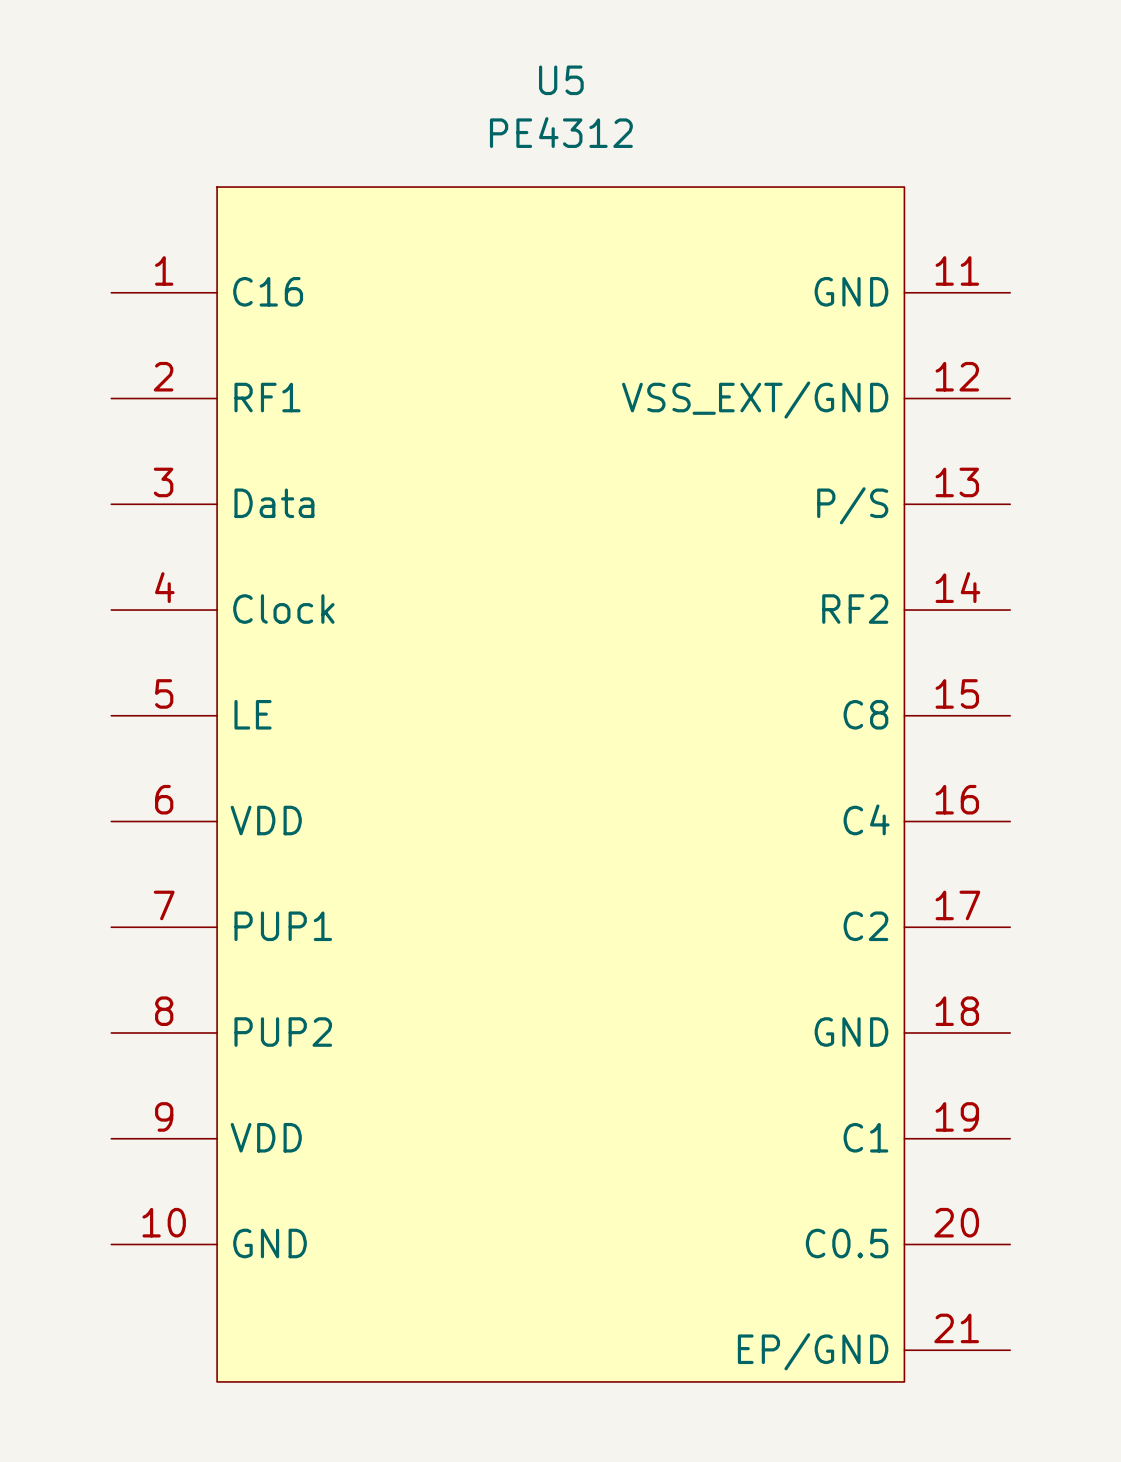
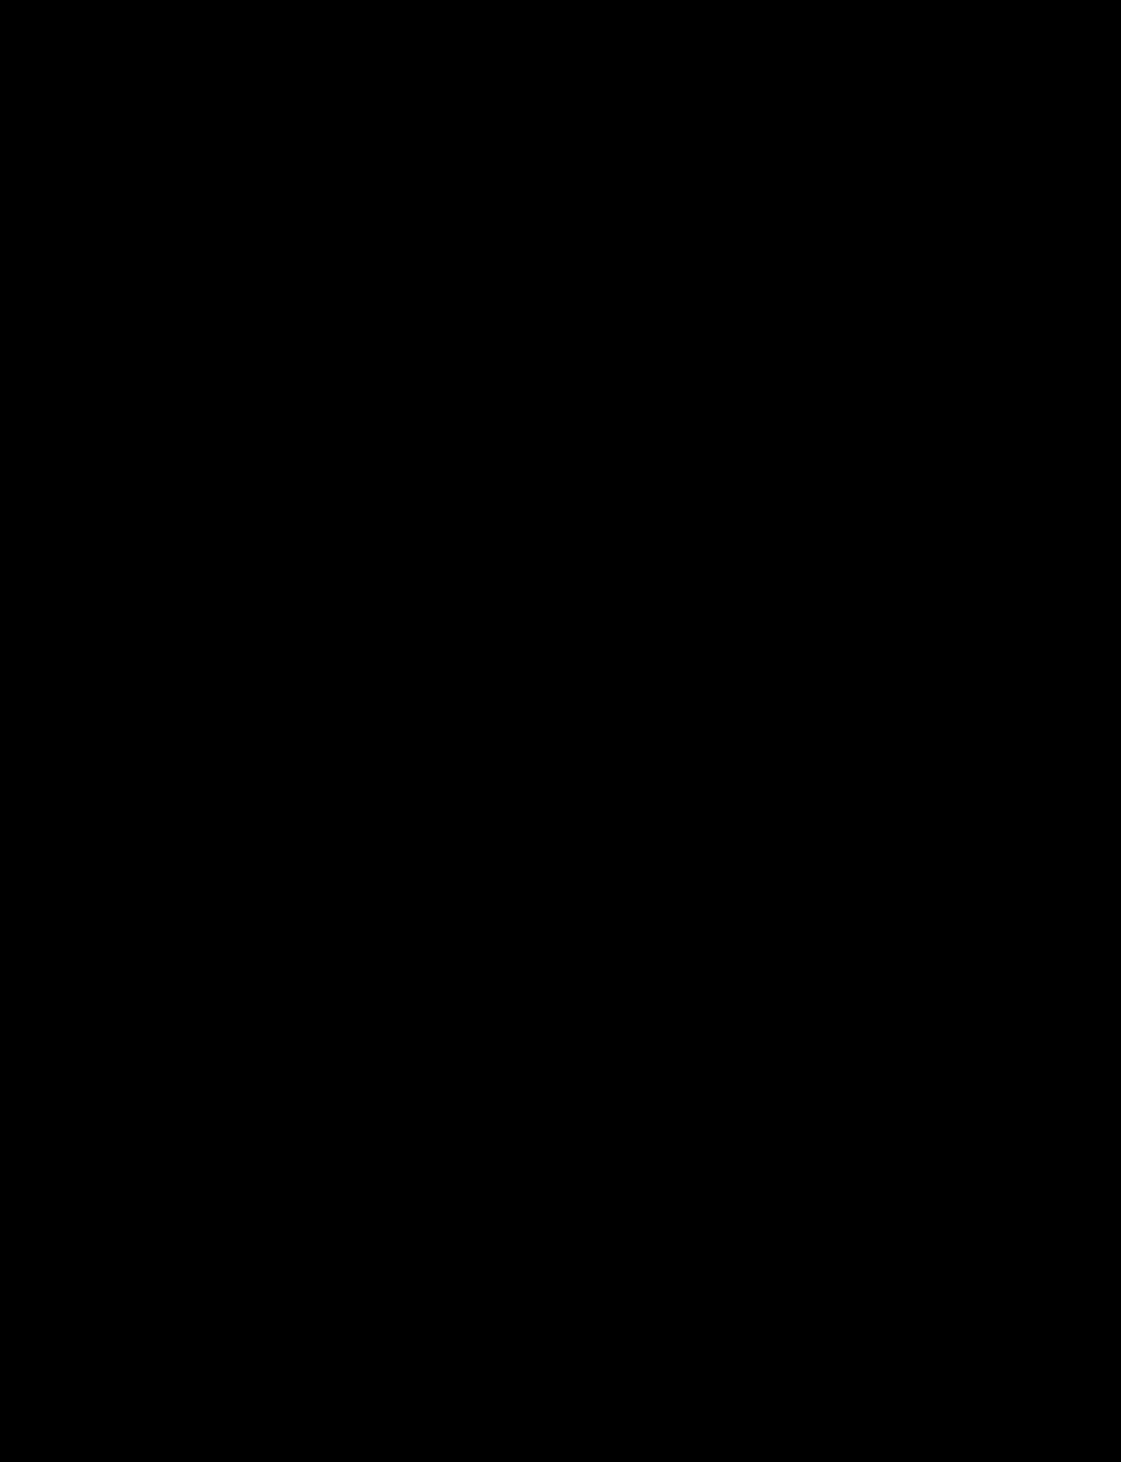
U5: PE4312 (560, 784) -> none

